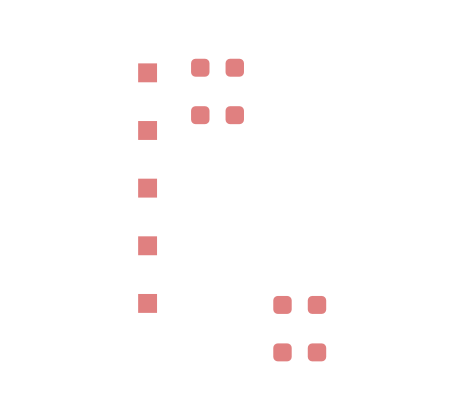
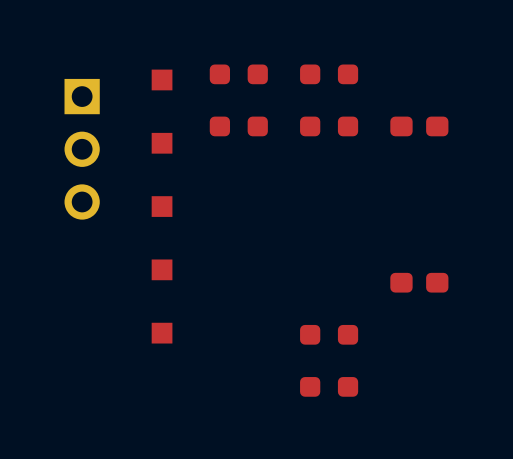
part: none -> (329, 74)
part: none -> (329, 126)
part: none -> (419, 126)
part: none -> (82, 149)
part: none -> (419, 282)

